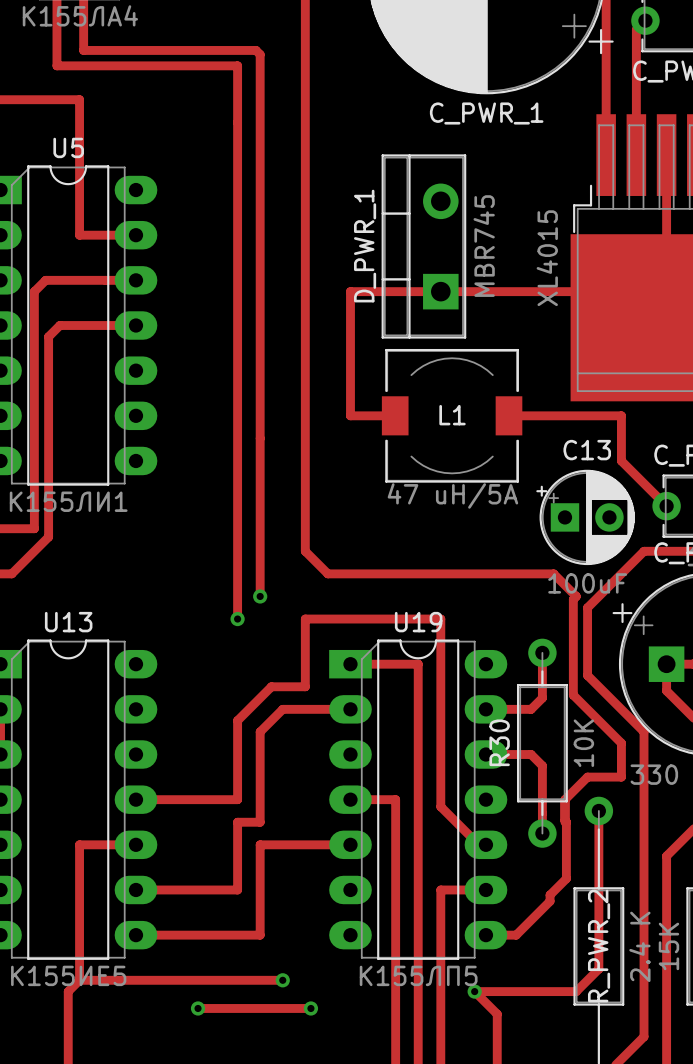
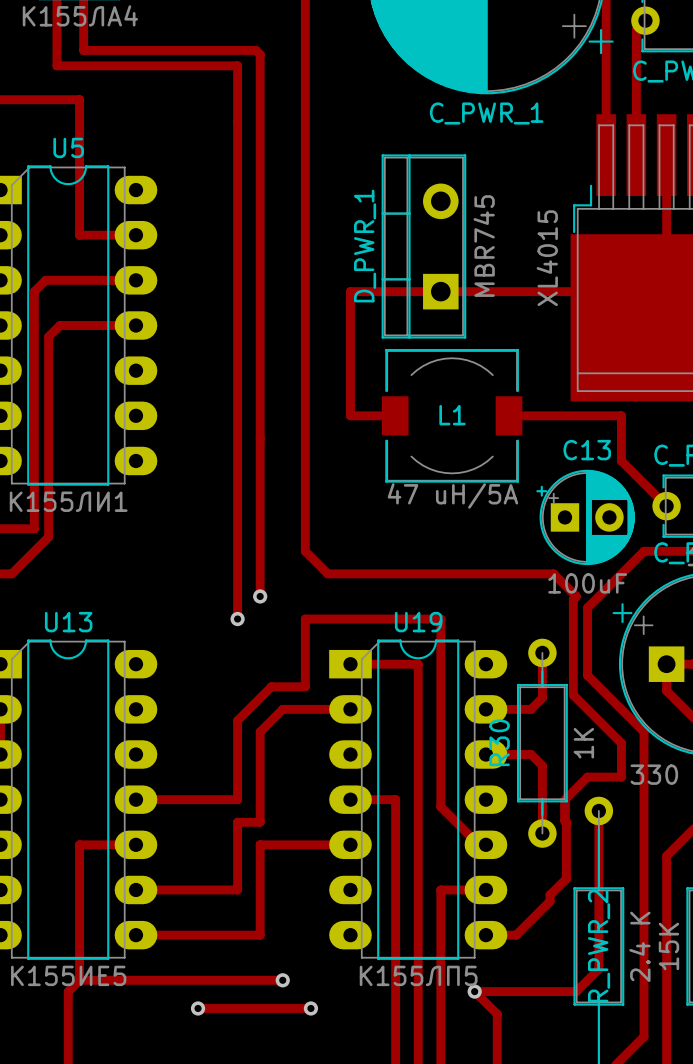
R30 value: 10K (583, 743) -> 1K (583, 743)

